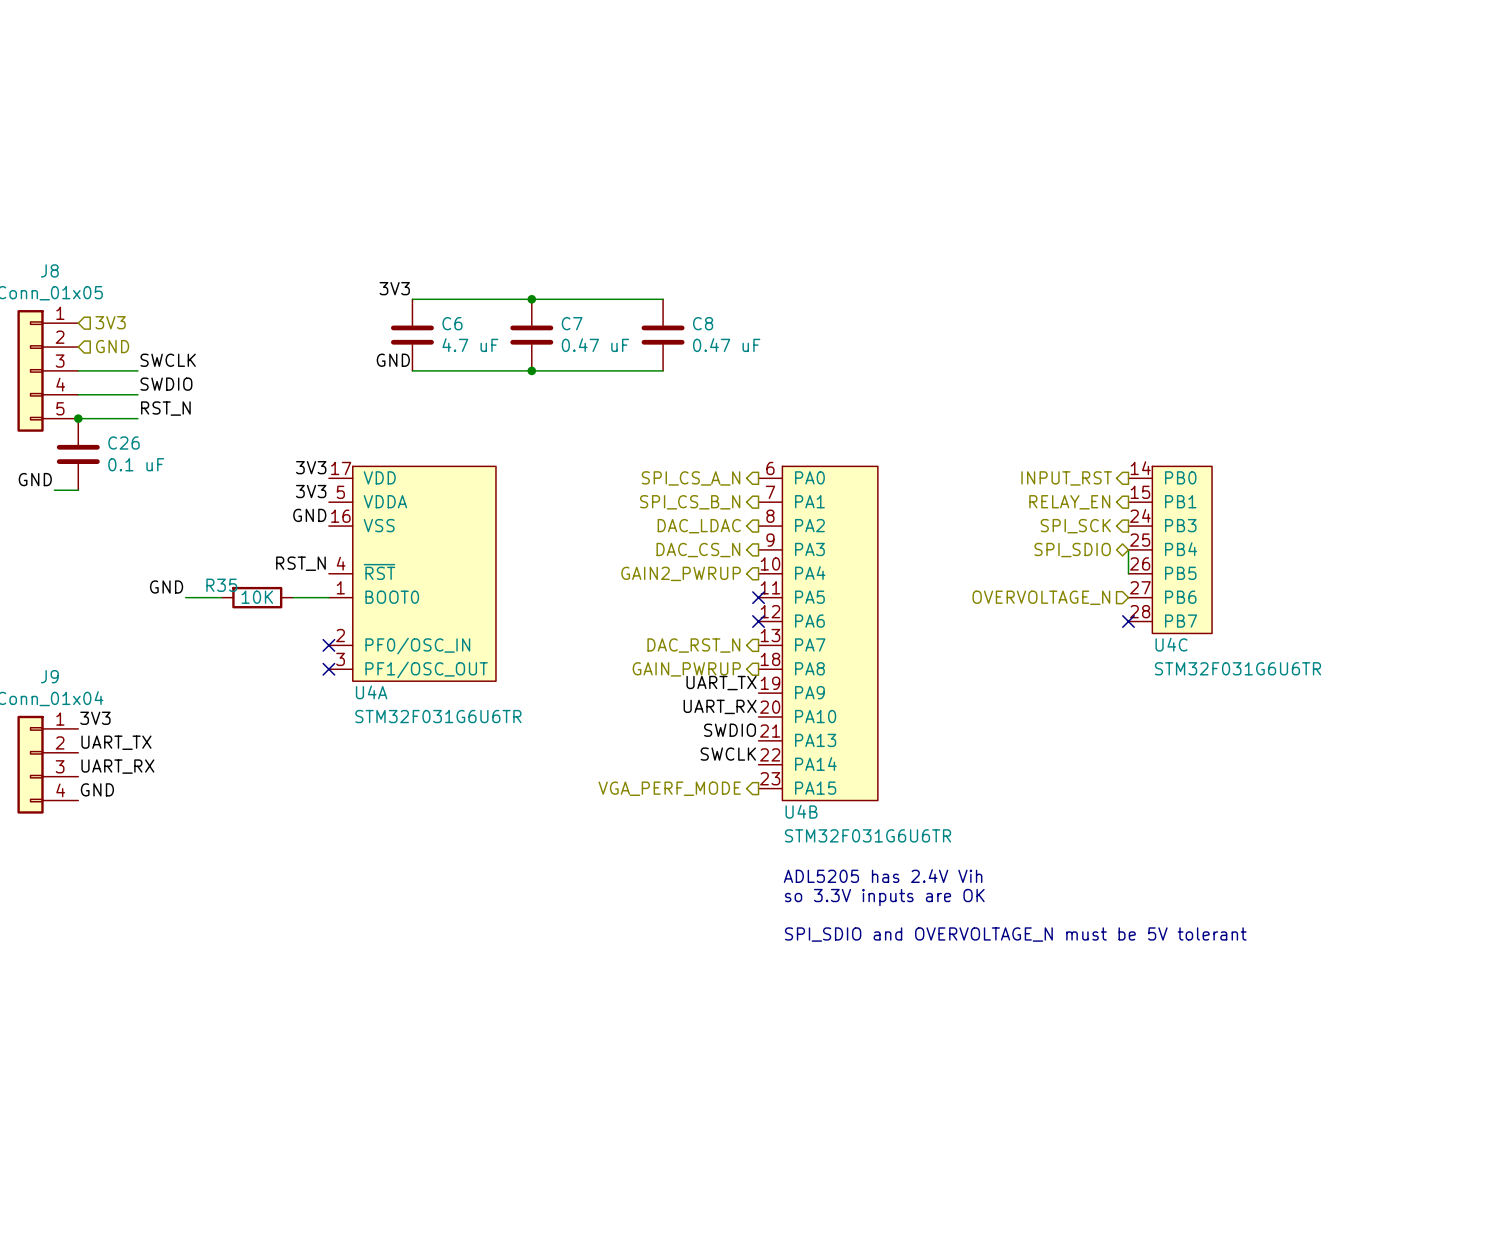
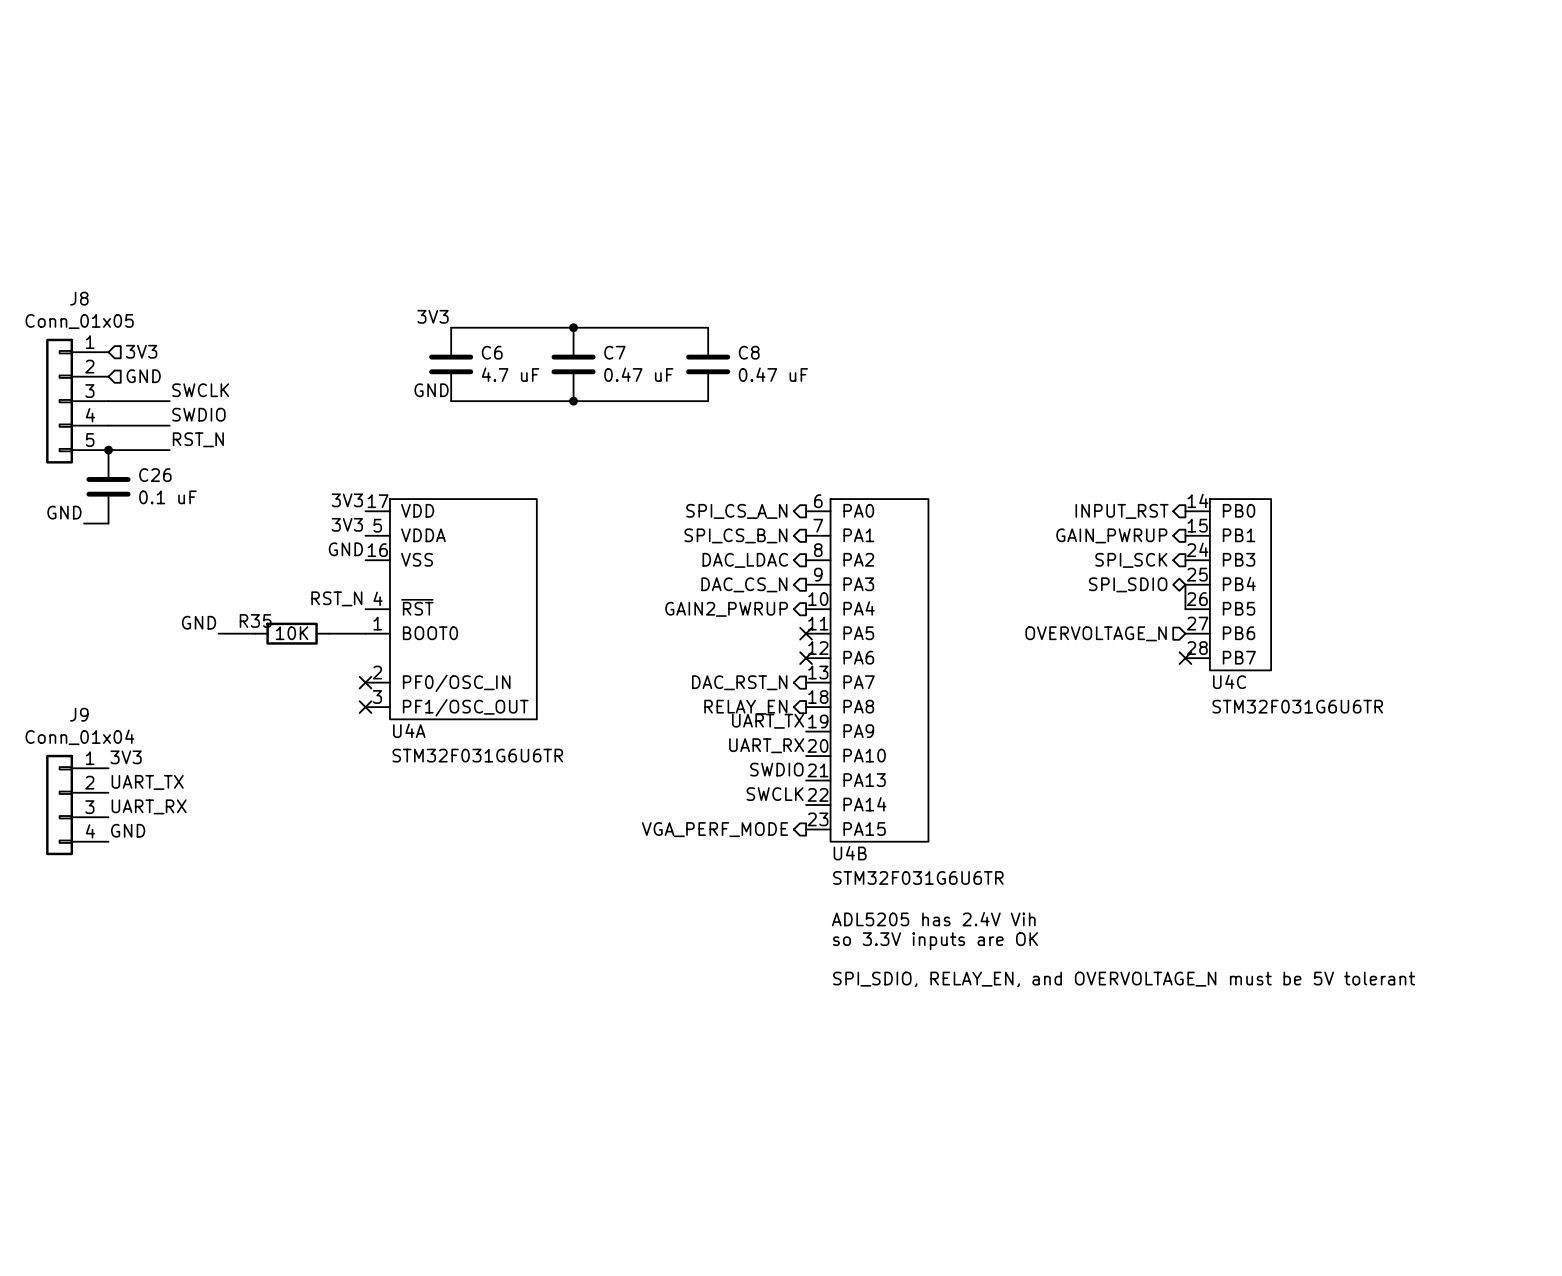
hierarchical label: RELAY_EN (1069, 502) -> GAIN_PWRUP (1111, 535)
hierarchical label: GAIN_PWRUP (686, 669) -> RELAY_EN (745, 707)
text: SPI_SDIO and OVERVOLTAGE_N must be 5V tolerant (1015, 934) -> SPI_SDIO, RELAY_EN, and OVERVOLTAGE_N must be 5V tolerant (1124, 979)

